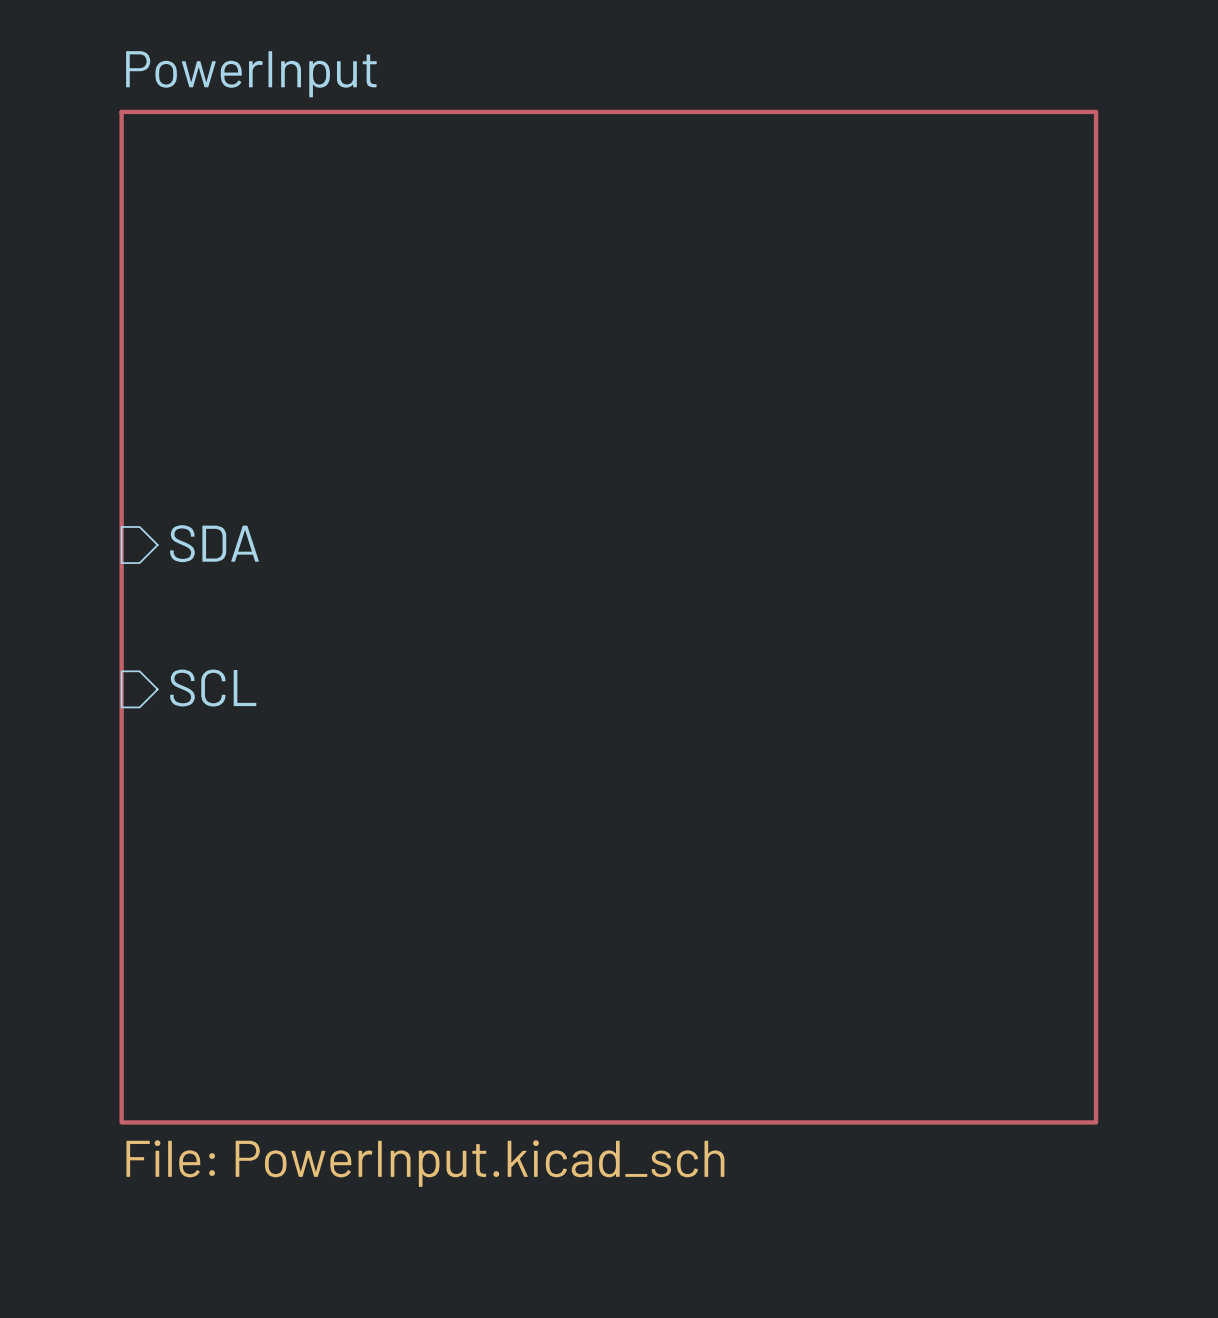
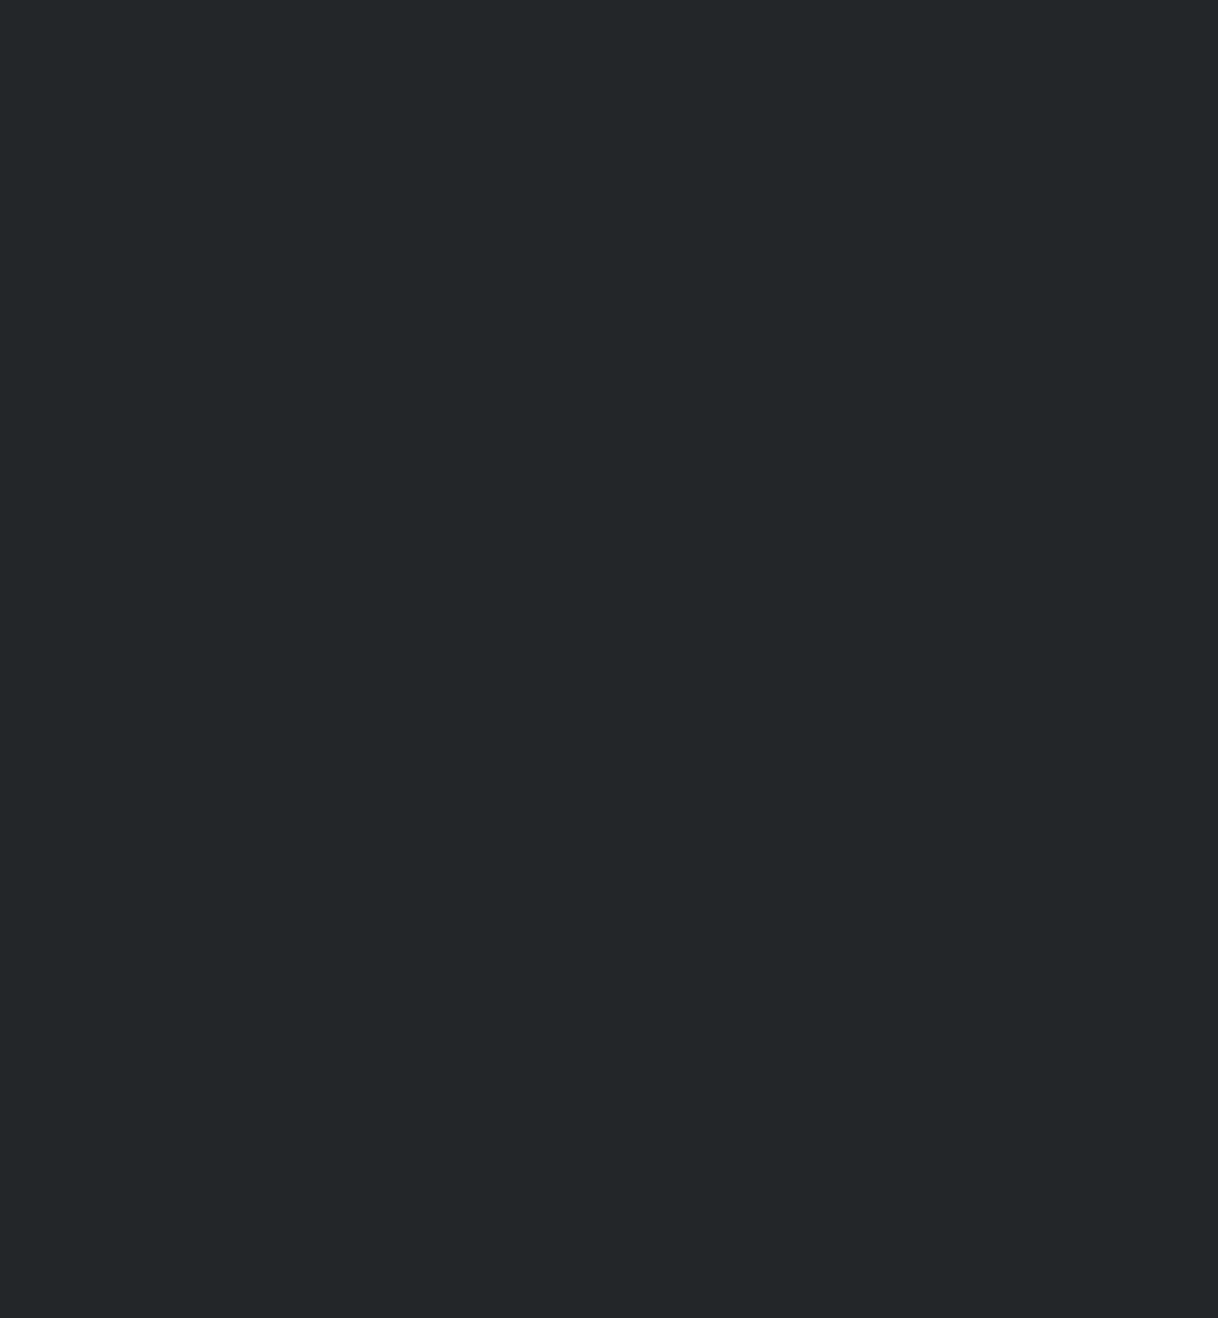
sheet pin: SDA (214, 543) -> none
sheet PowerInput: File: PowerInput.kicad_sch (608, 617) -> none
sheet pin: SCL (213, 688) -> none

